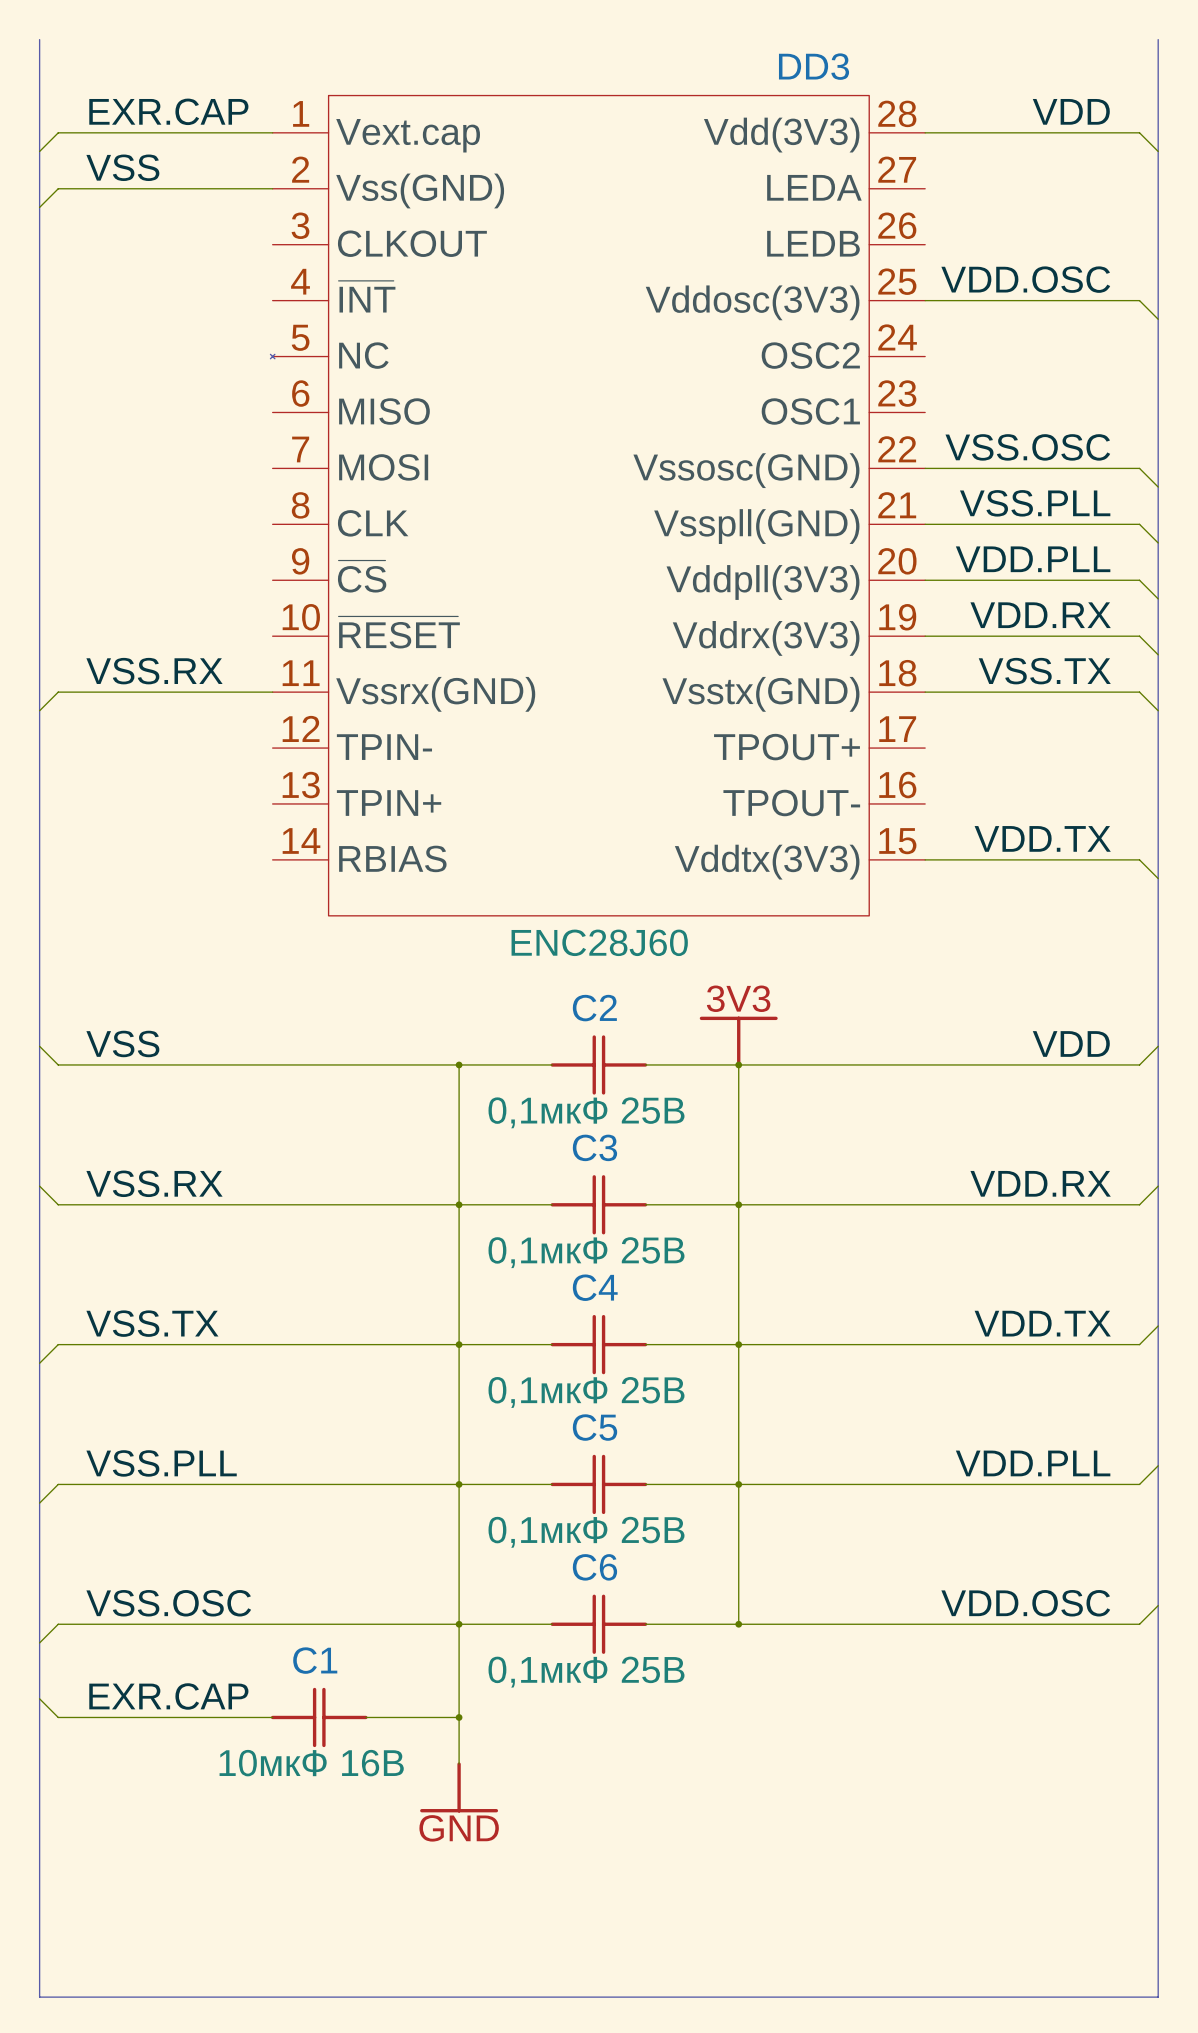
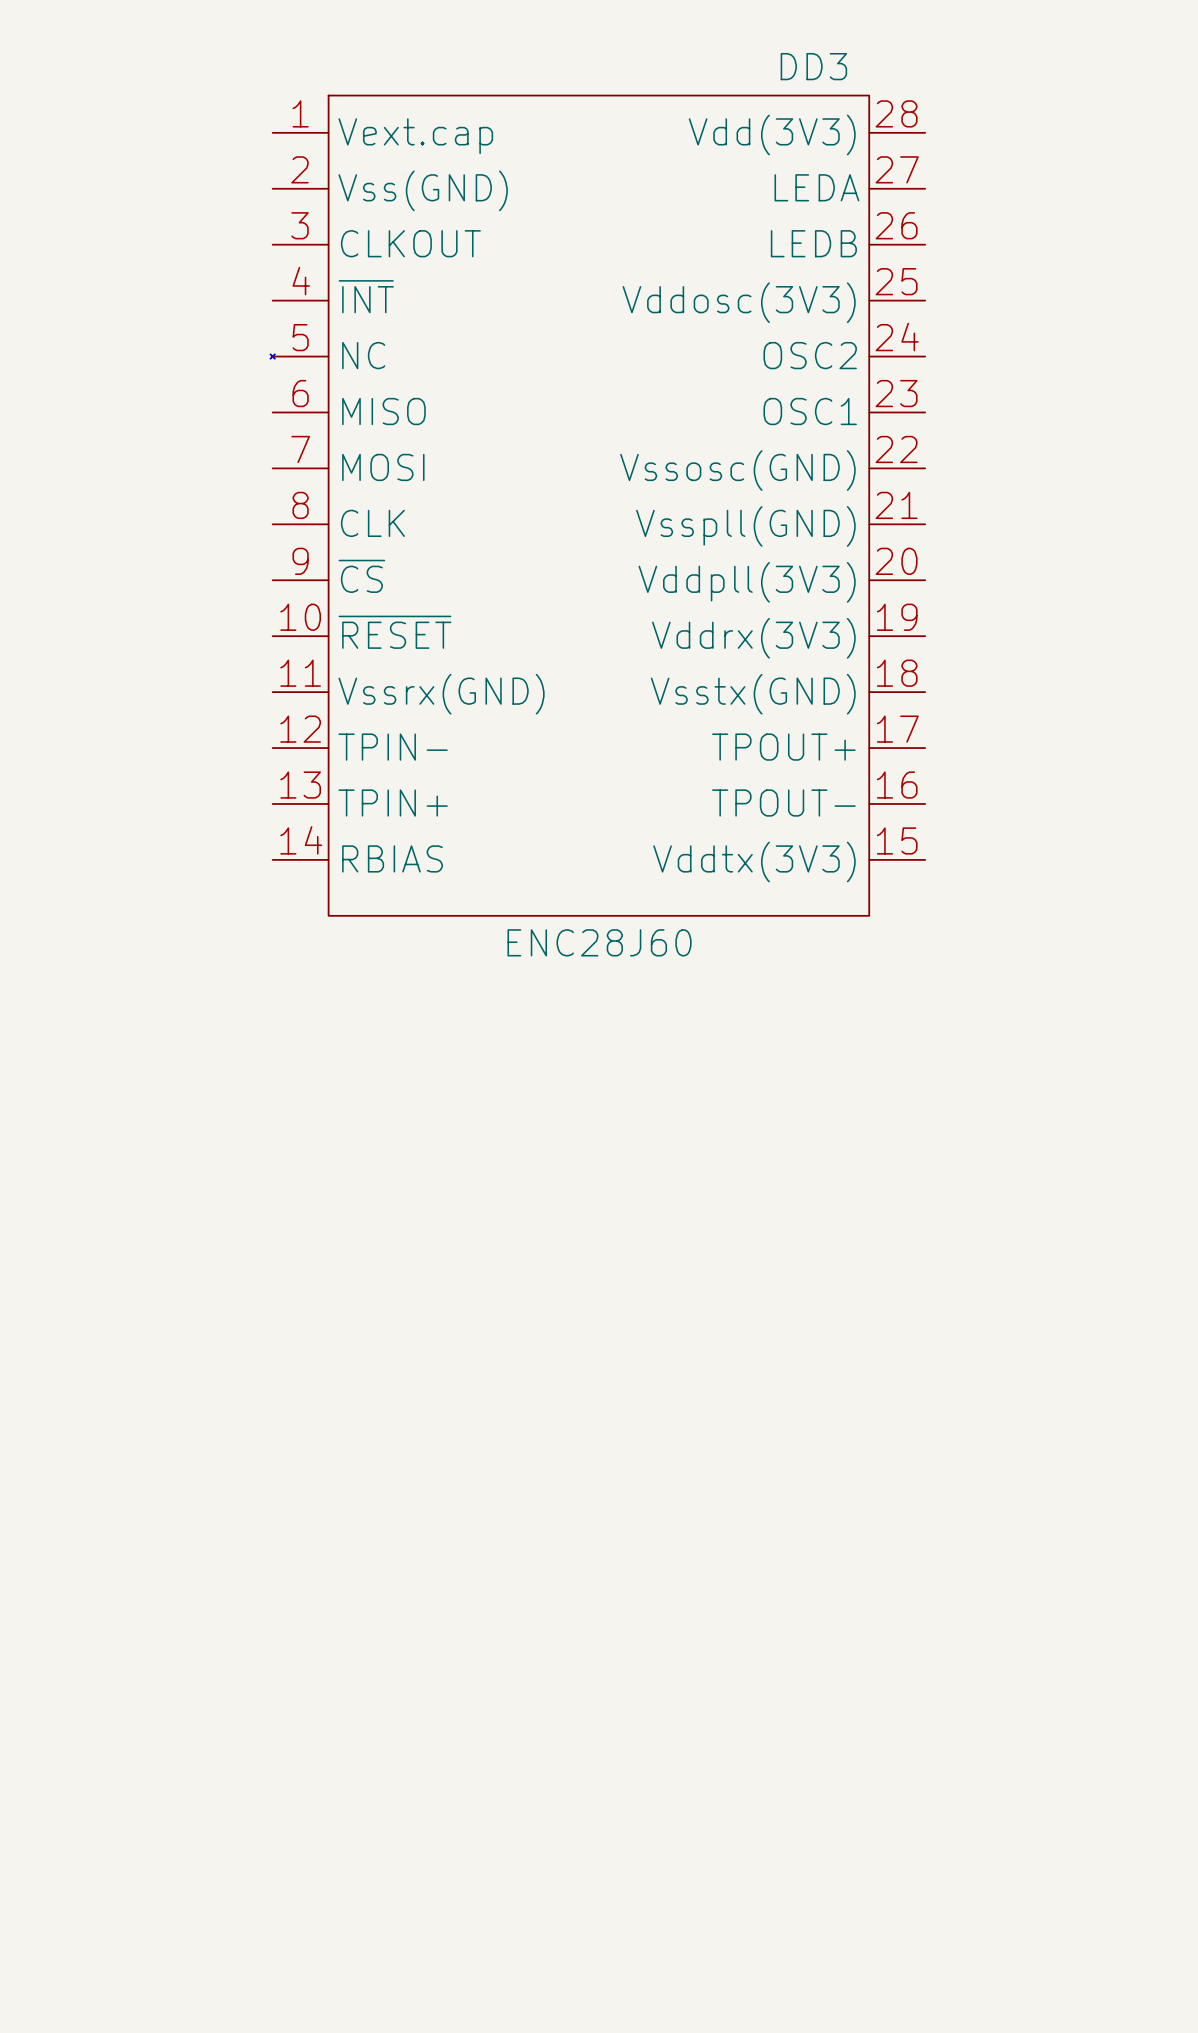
bus: (39, 39) (39, 1997) (1158, 1997) (1158, 39) -> none
label: EXR.CAP (168, 111) -> none
label: VDD (1071, 111) -> none
wire: (272, 132) (58, 132) (39, 151) -> none
wire: (925, 132) (1139, 132) (1158, 151) -> none
label: VSS (122, 167) -> none
wire: (272, 188) (58, 188) (39, 207) -> none
label: VDD.OSC (1025, 279) -> none
wire: (925, 300) (1139, 300) (1158, 319) -> none
label: VSS.OSC (1027, 447) -> none
wire: (925, 468) (1139, 468) (1158, 487) -> none
label: VSS.PLL (1035, 503) -> none
wire: (925, 524) (1139, 524) (1158, 542) -> none
label: VDD.PLL (1033, 559) -> none
wire: (925, 580) (1139, 580) (1158, 598) -> none
label: VDD.RX (1040, 615) -> none
wire: (925, 636) (1139, 636) (1158, 654) -> none
label: VSS.RX (154, 671) -> none
label: VSS.TX (1044, 671) -> none
wire: (272, 692) (58, 692) (39, 710) -> none
wire: (925, 692) (1139, 692) (1158, 710) -> none
label: VDD.TX (1042, 838) -> none
wire: (925, 859) (1139, 859) (1158, 878) -> none
power symbol: (738, 1041) -> none
label: VSS (122, 1043) -> none
label: VDD (1071, 1043) -> none
wire: (39, 1046) (58, 1064) (552, 1064) -> none
wire: (1158, 1046) (1139, 1064) (645, 1064) -> none
wire: (459, 1064) (459, 1764) -> none
junction: (459, 1064) -> none
C2: (598, 1064) -> none
wire: (738, 1064) (738, 1624) -> none
junction: (738, 1064) -> none
label: VSS.RX (154, 1183) -> none
label: VDD.RX (1040, 1183) -> none
wire: (39, 1186) (58, 1204) (552, 1204) -> none
wire: (1158, 1186) (1139, 1204) (645, 1204) -> none
junction: (459, 1204) -> none
C3: (598, 1204) -> none
junction: (738, 1204) -> none
label: VSS.TX (152, 1323) -> none
label: VDD.TX (1042, 1323) -> none
wire: (1158, 1325) (1139, 1344) (645, 1344) -> none
junction: (459, 1344) -> none
wire: (552, 1344) (58, 1344) (39, 1363) -> none
C4: (598, 1344) -> none
junction: (738, 1344) -> none
label: VSS.PLL (161, 1463) -> none
label: VDD.PLL (1033, 1463) -> none
wire: (1158, 1465) (1139, 1484) (645, 1484) -> none
junction: (459, 1484) -> none
wire: (552, 1484) (58, 1484) (39, 1503) -> none
C5: (598, 1484) -> none
junction: (738, 1484) -> none
label: VSS.OSC (168, 1603) -> none
label: VDD.OSC (1025, 1603) -> none
wire: (1158, 1605) (1139, 1624) (645, 1624) -> none
junction: (459, 1624) -> none
wire: (552, 1624) (58, 1624) (39, 1642) -> none
C6: (598, 1624) -> none
junction: (738, 1624) -> none
label: EXR.CAP (168, 1696) -> none
wire: (39, 1698) (58, 1717) (272, 1717) -> none
C1: (319, 1717) -> none
wire: (365, 1717) (459, 1717) -> none
junction: (459, 1717) -> none
power symbol: (459, 1787) -> none

